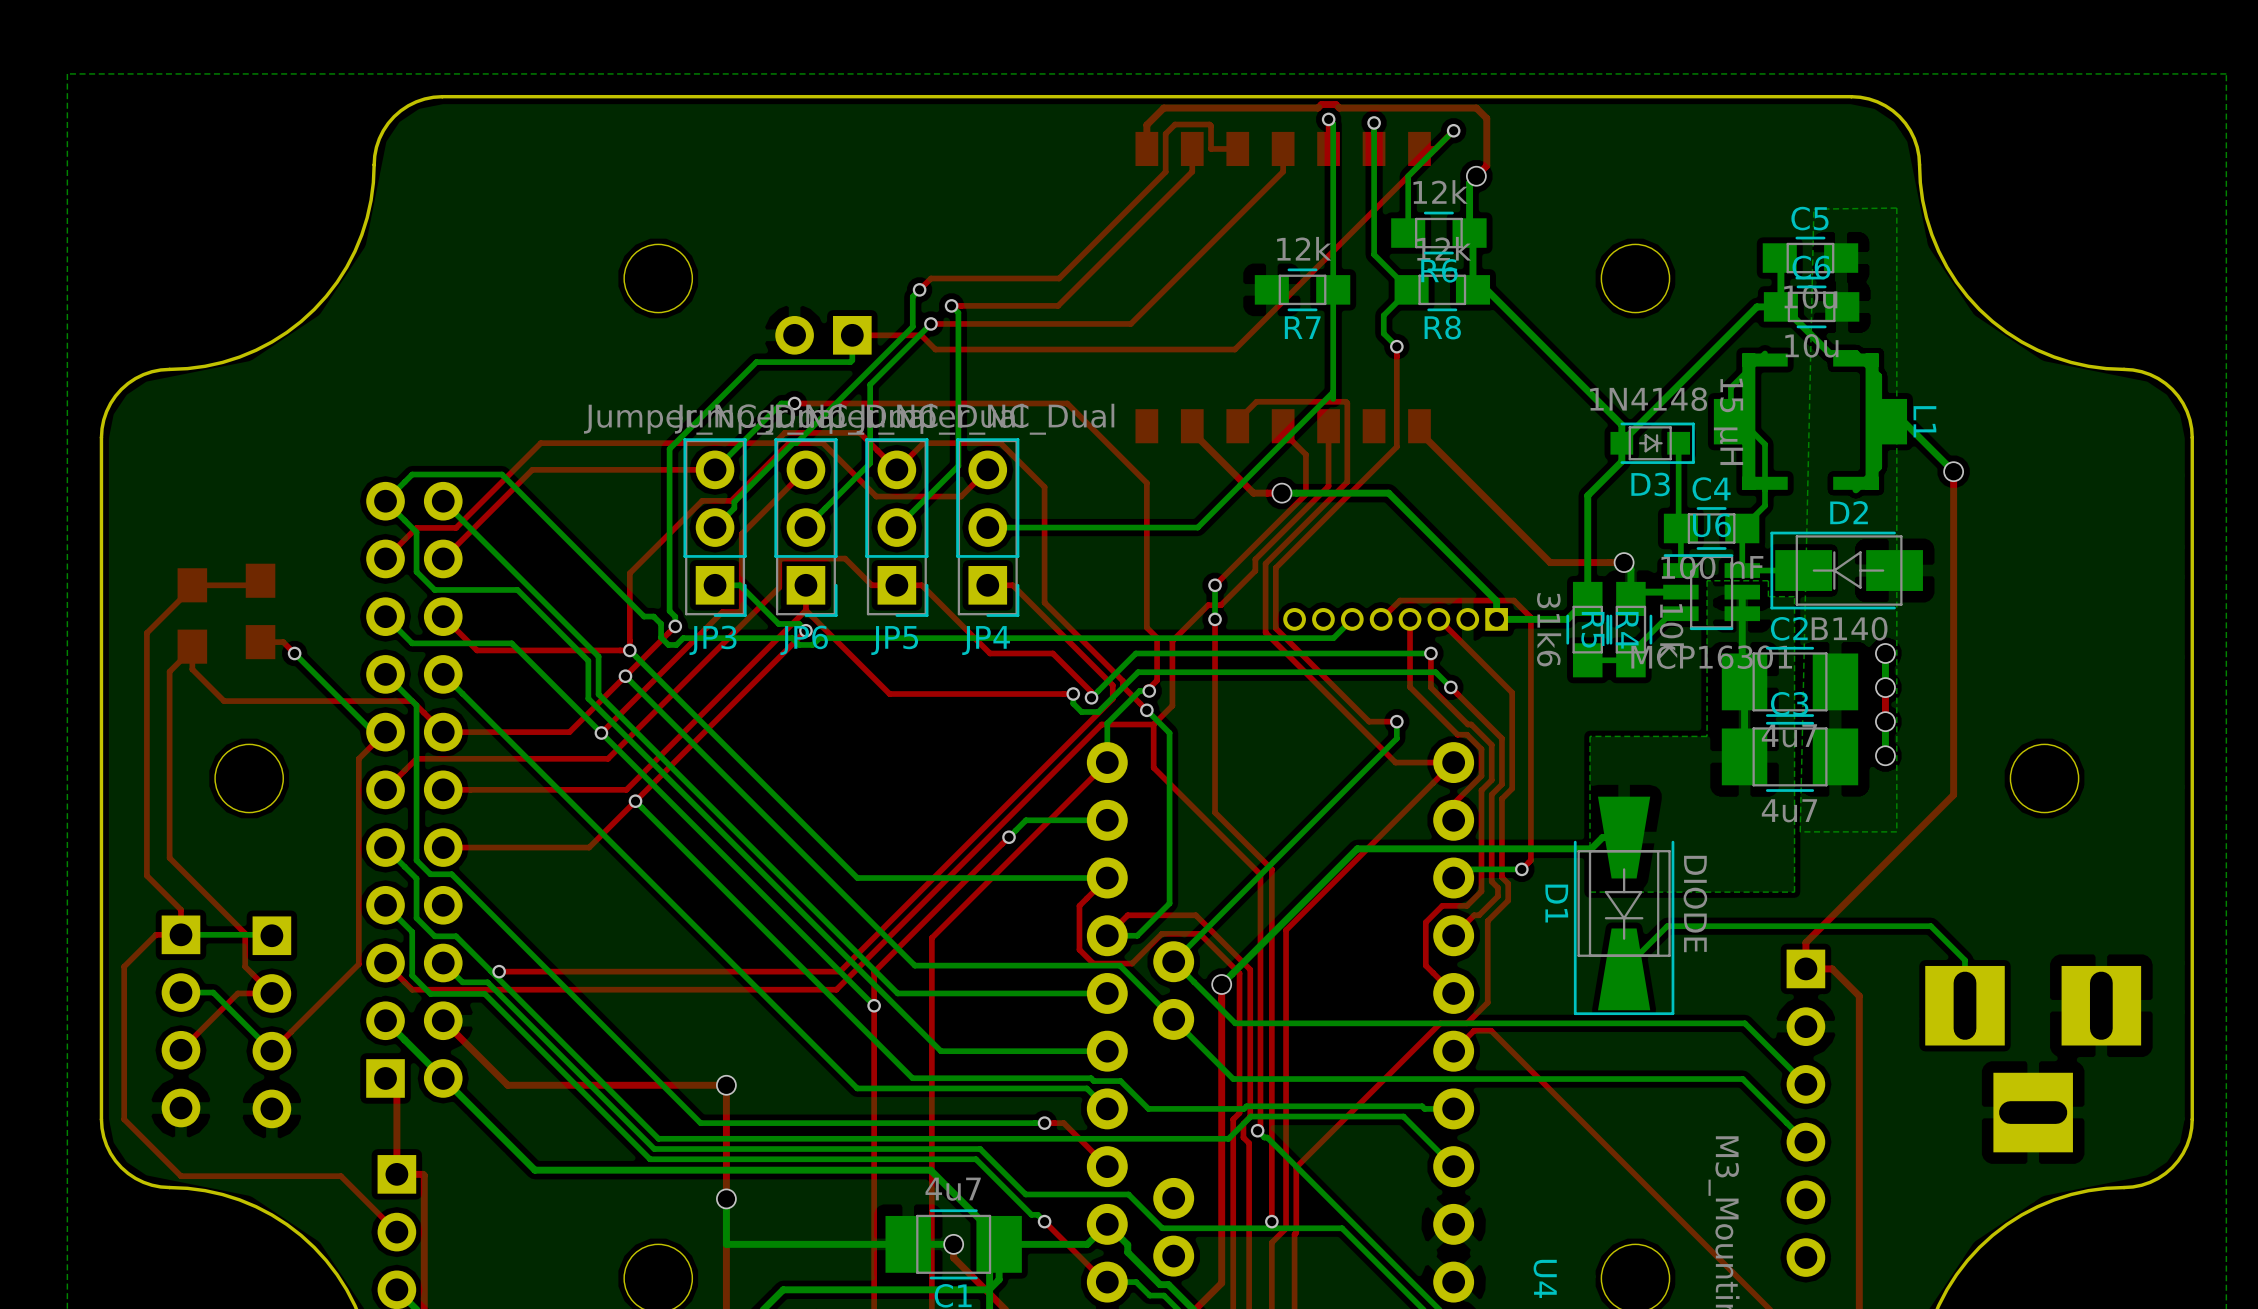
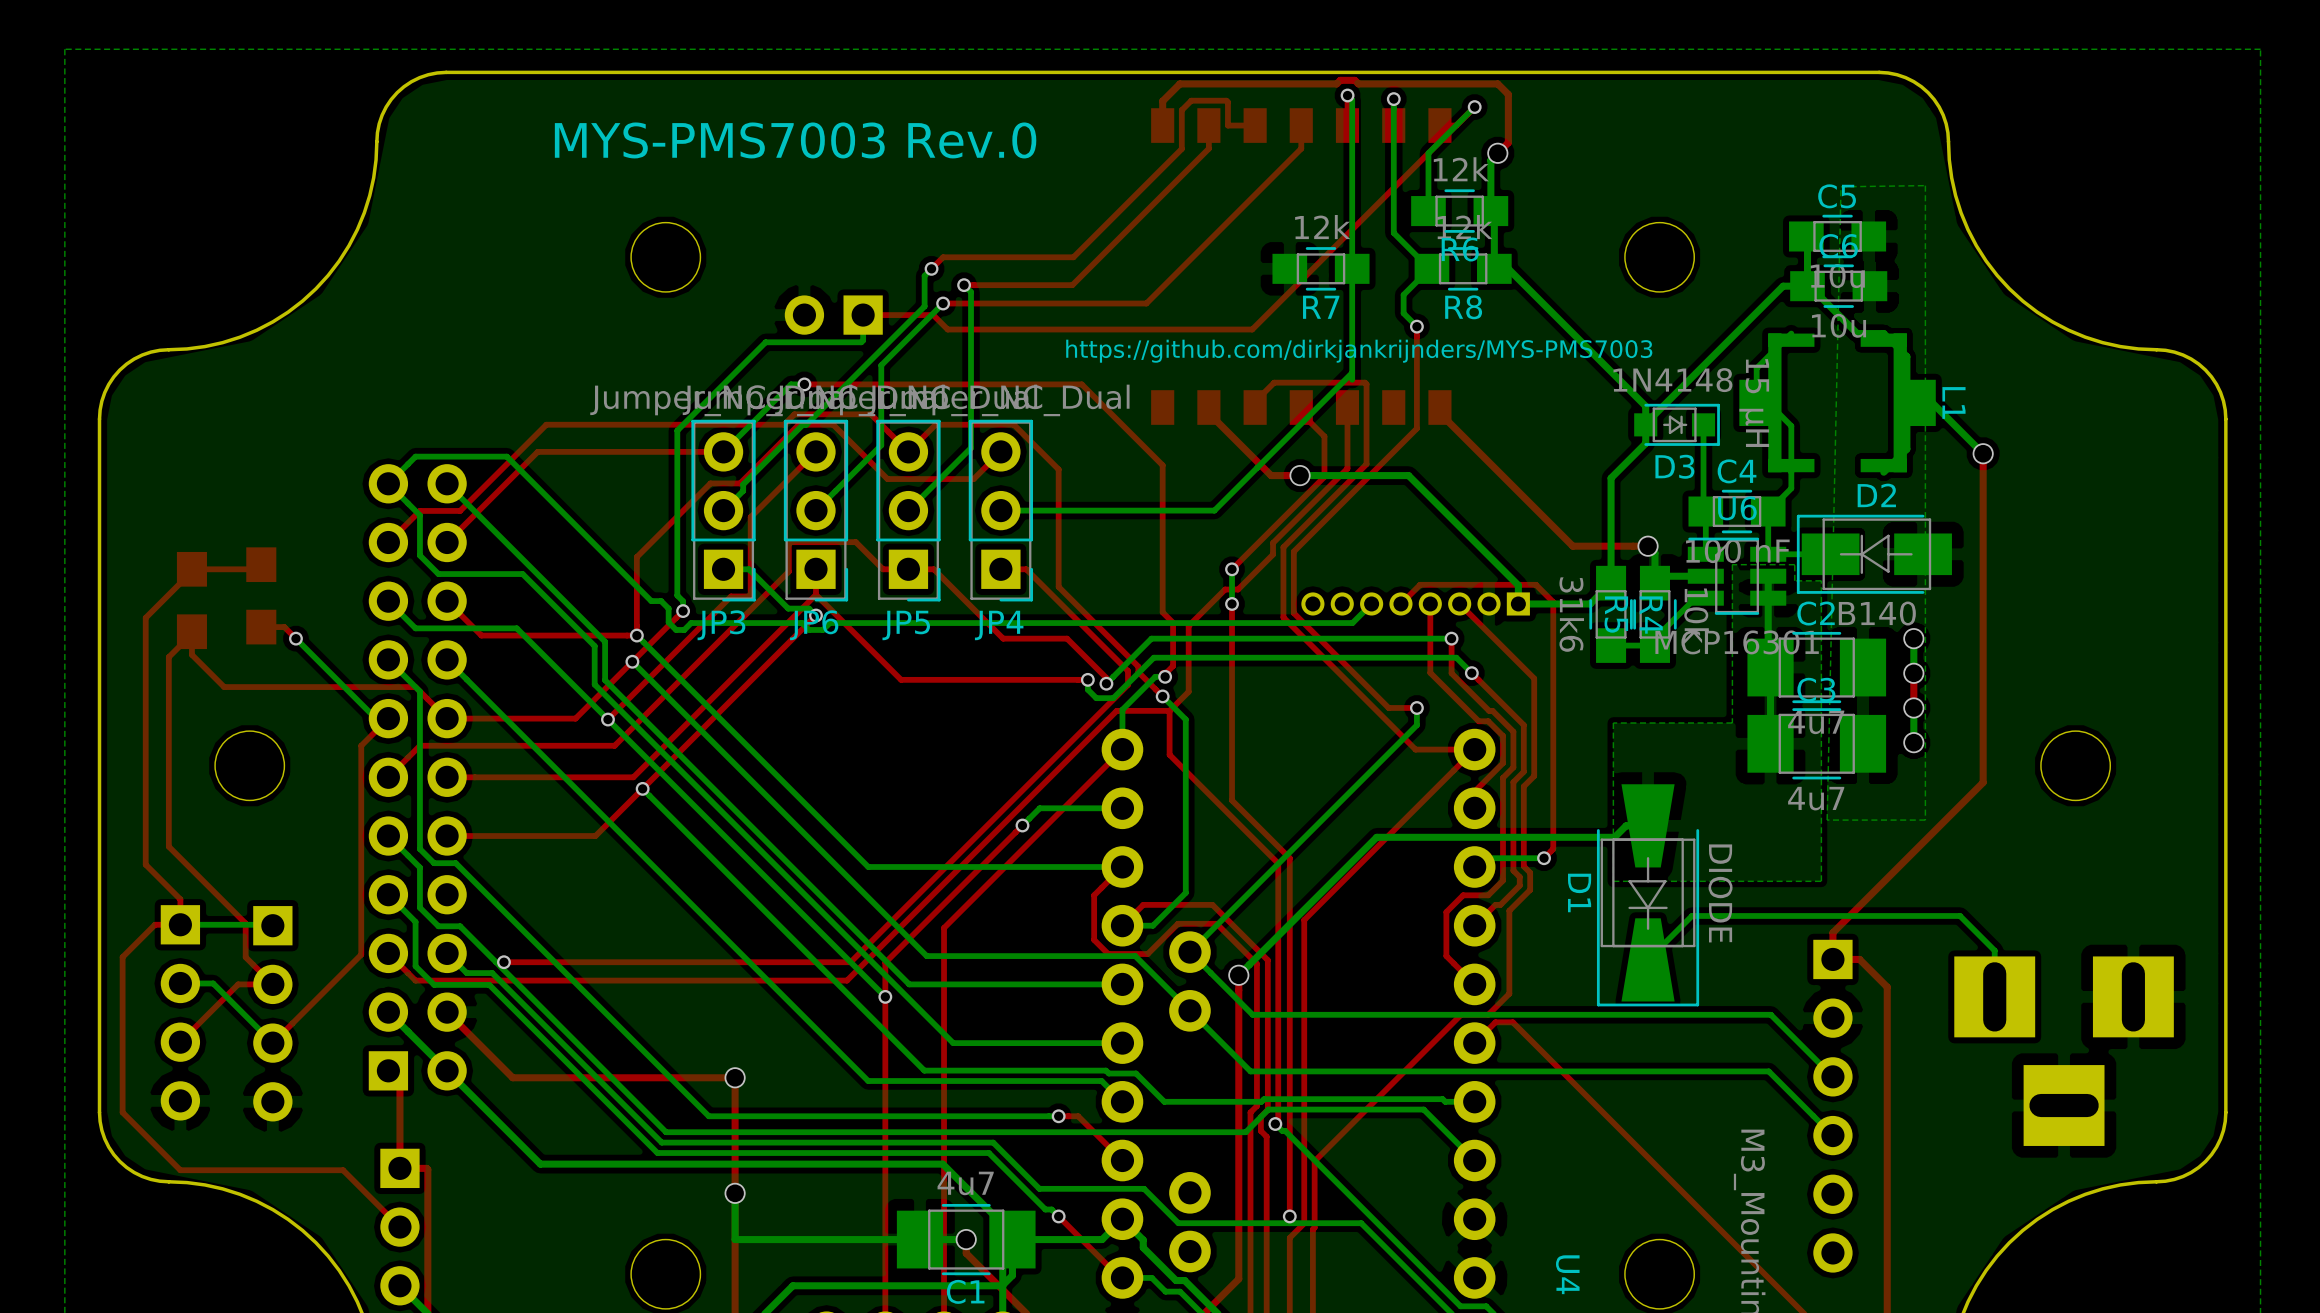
text: none -> MYS-PMS7003 Rev.0 (795, 140)
text: none -> https://github.com/dirkjankrijnders/MYS-PMS7003 (1359, 351)

